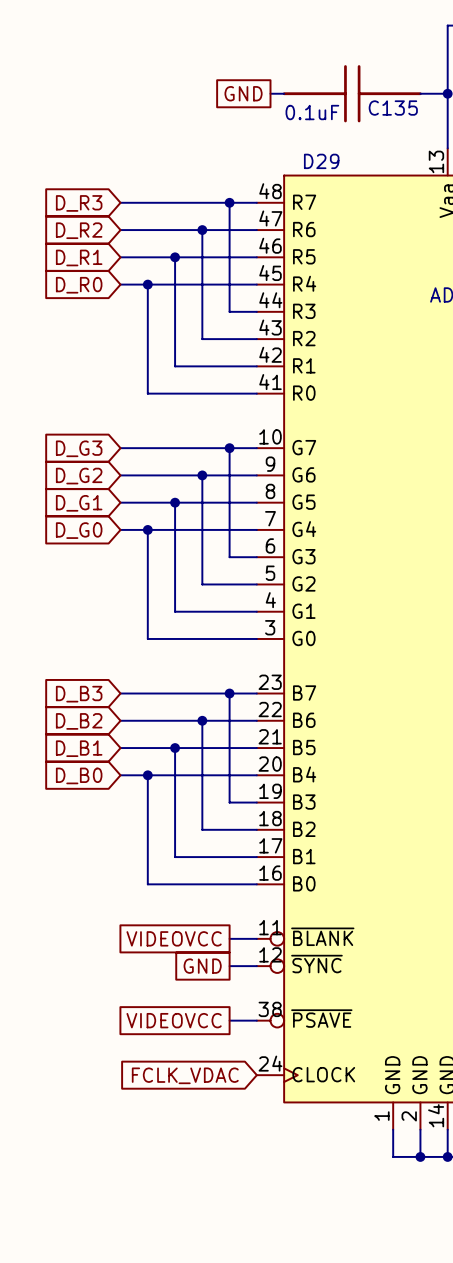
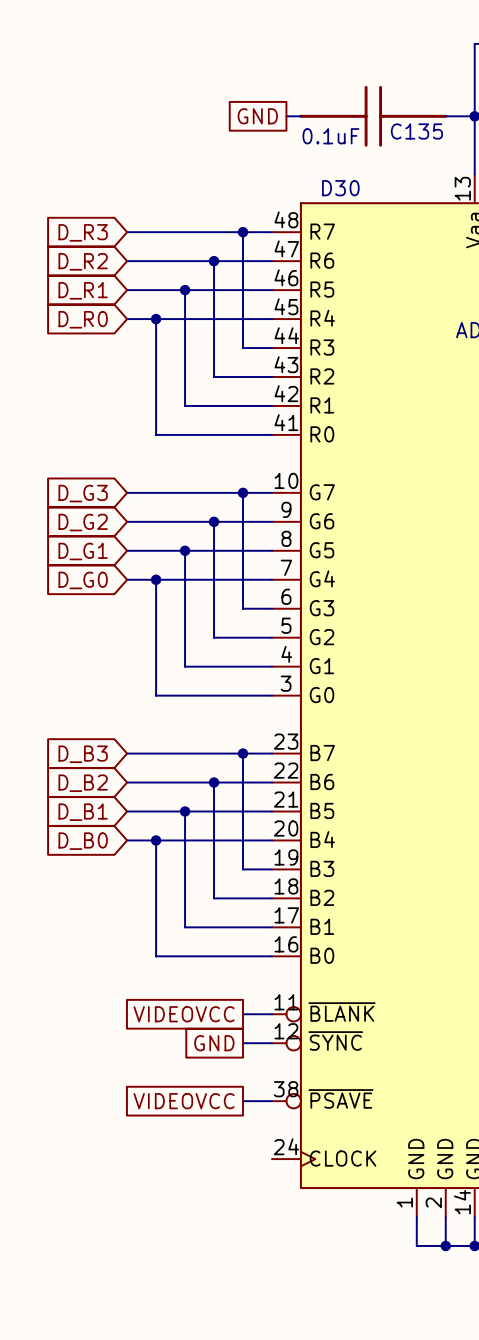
D29 name: D29 (321, 161) -> D30 (340, 188)
global label: FCLK_VDAC (185, 1075) -> none

